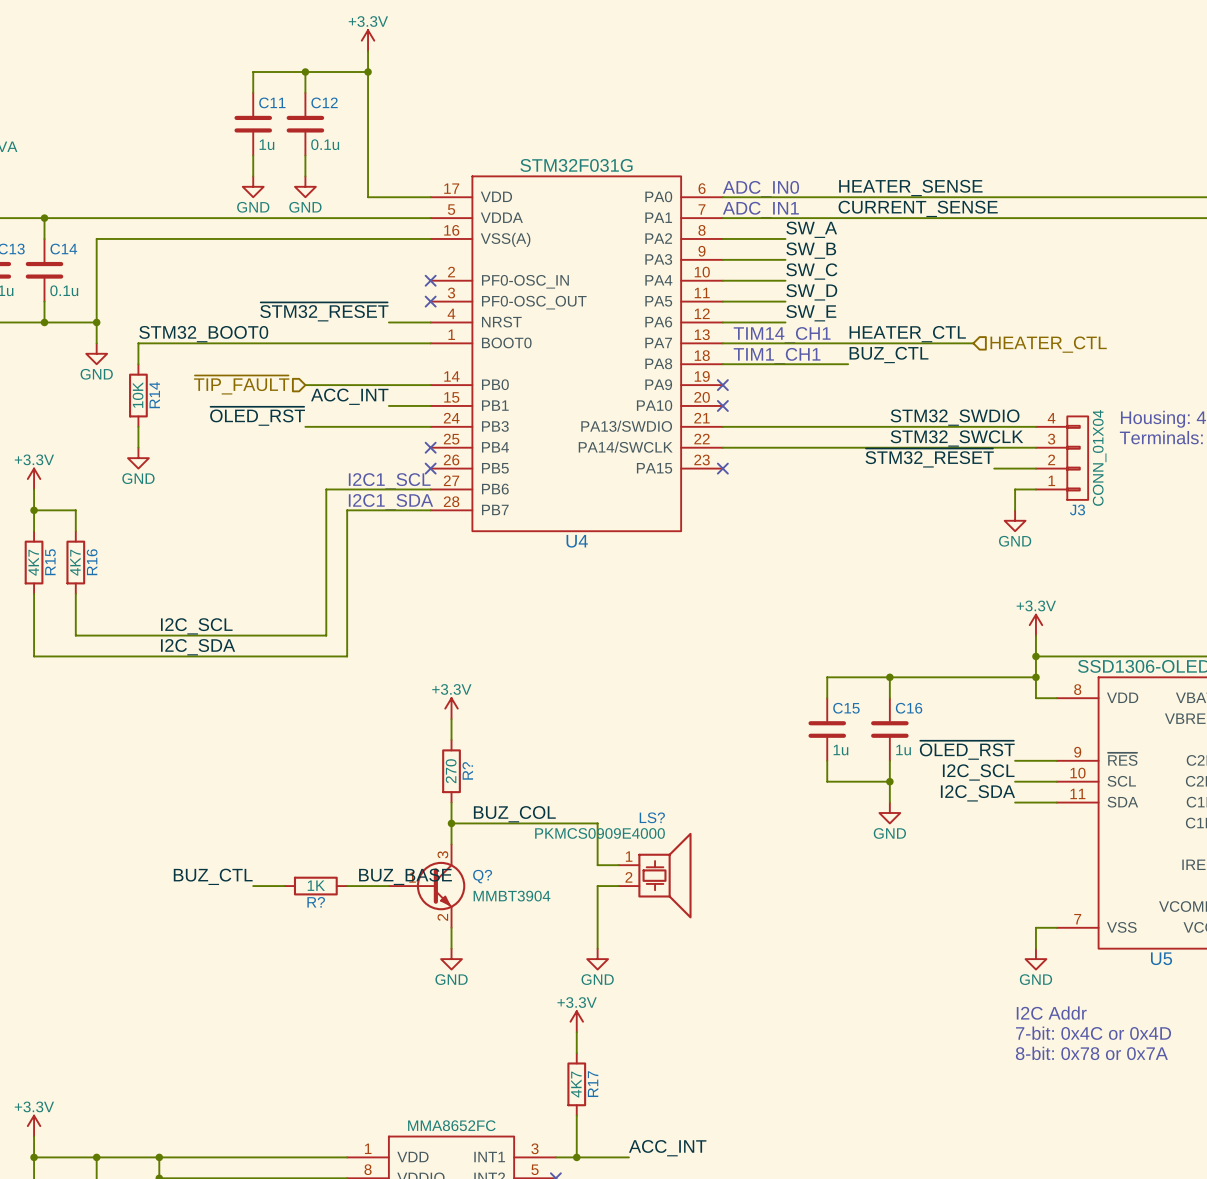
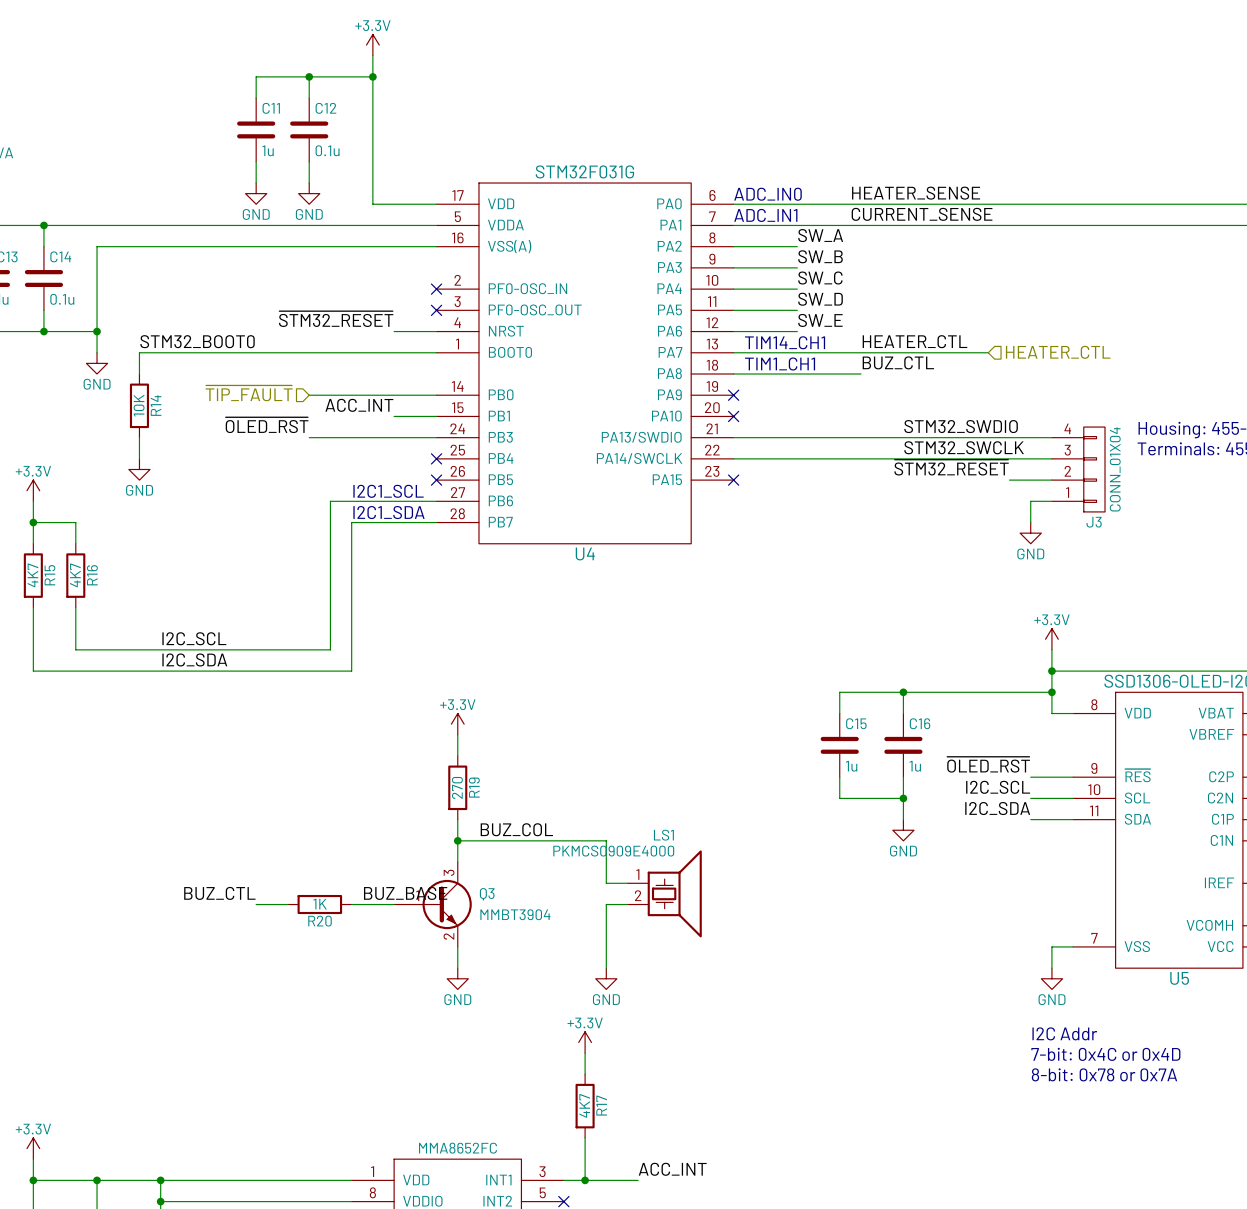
R? name: R? (467, 770) -> R19 (474, 787)
LS? name: LS? (652, 817) -> LS1 (663, 835)
Q? name: Q? (482, 876) -> Q3 (487, 894)
R? name: R? (316, 902) -> R20 (320, 921)

